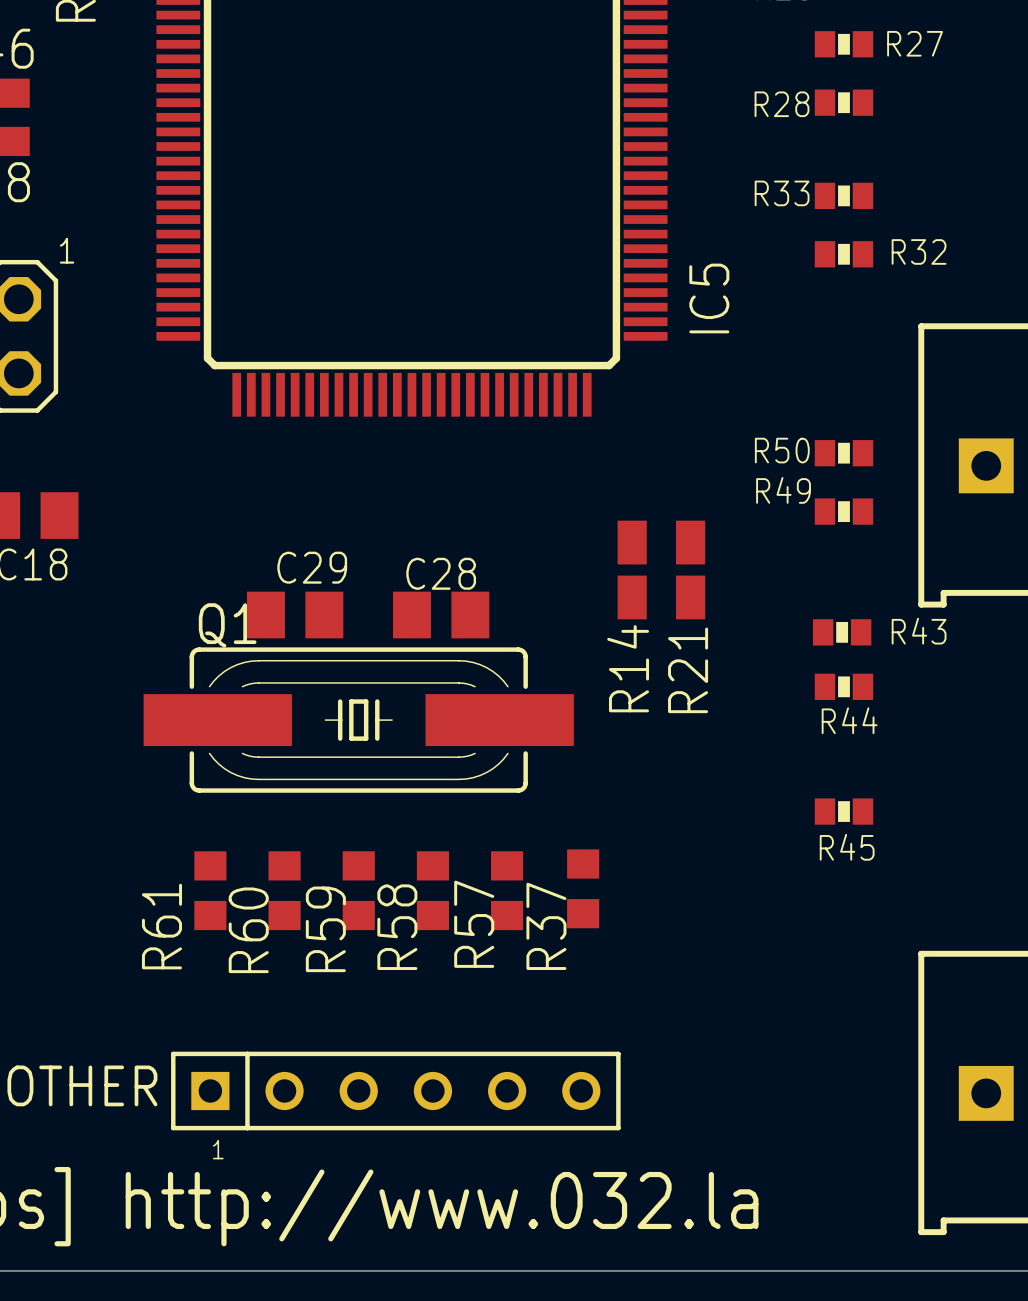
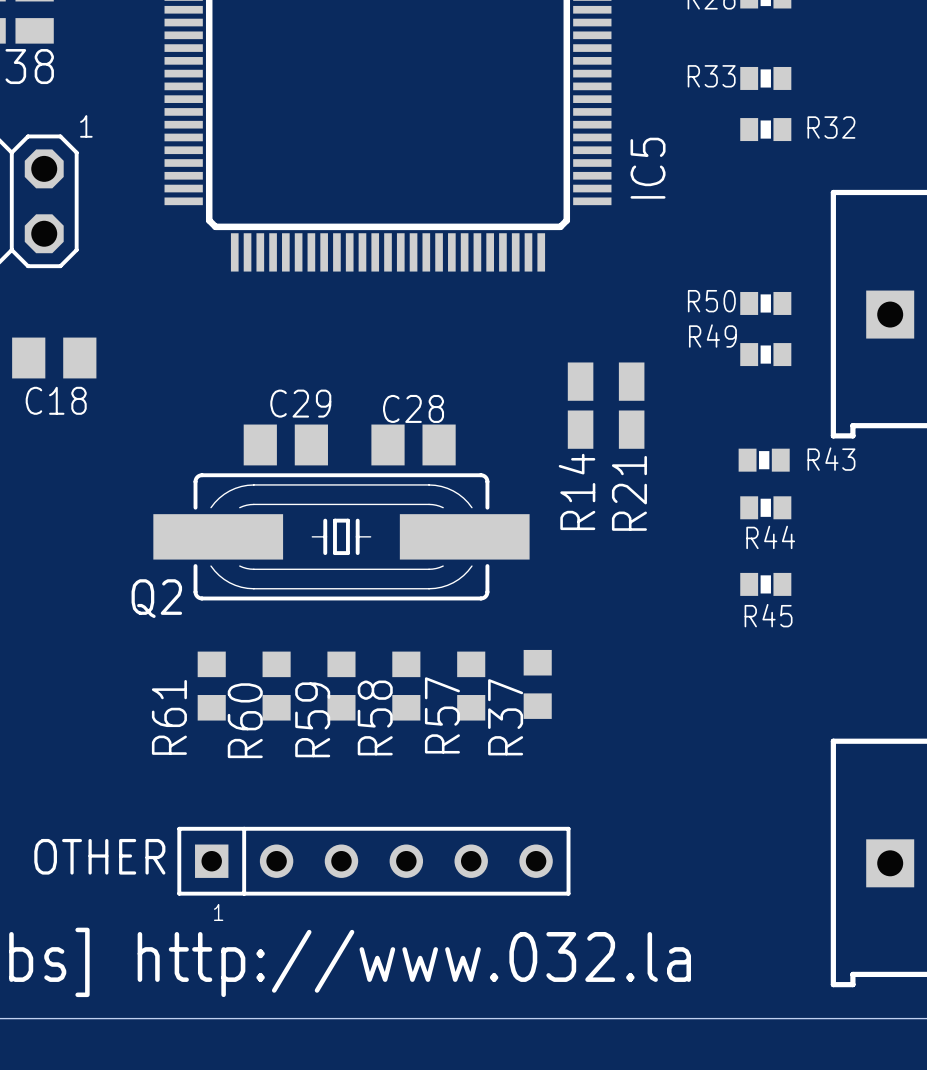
Q1 name: Q1 (227, 625) -> Q2 (156, 598)
R45 position: (843, 811) -> (765, 584)

